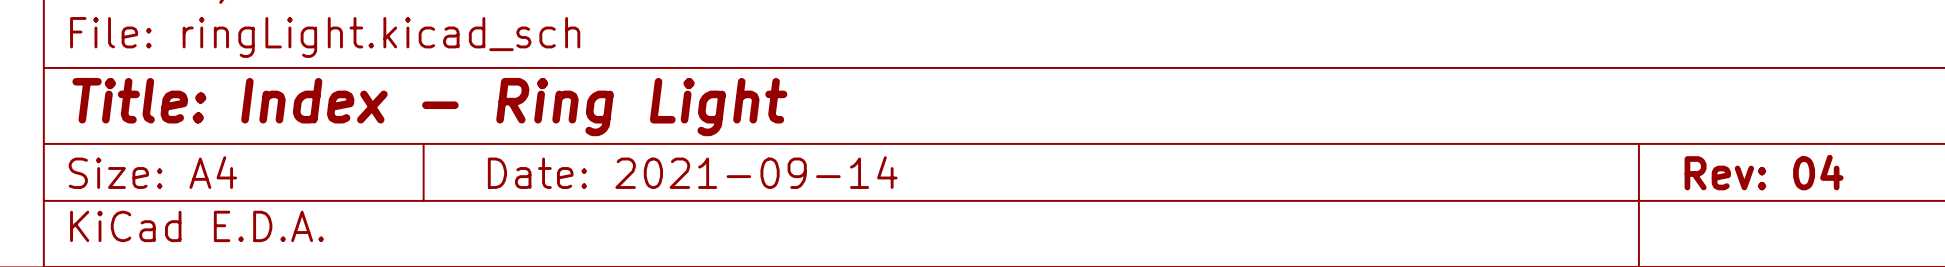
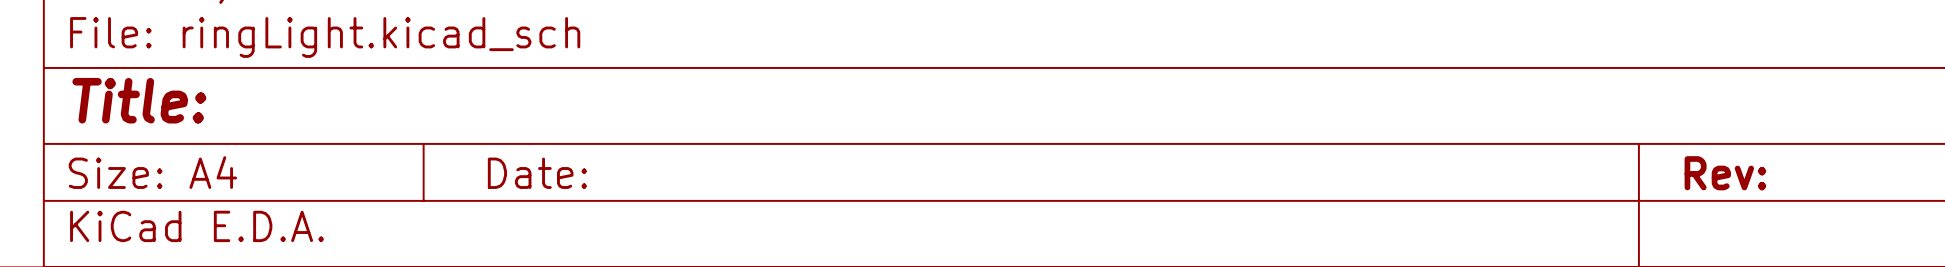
title block: Title: Index - Ring Light (429, 107) -> Title: (139, 100)
title block: Date: 2021-09-14 (692, 172) -> Date: (537, 173)
title block: Rev: 04 (1764, 172) -> Rev: (1725, 173)

